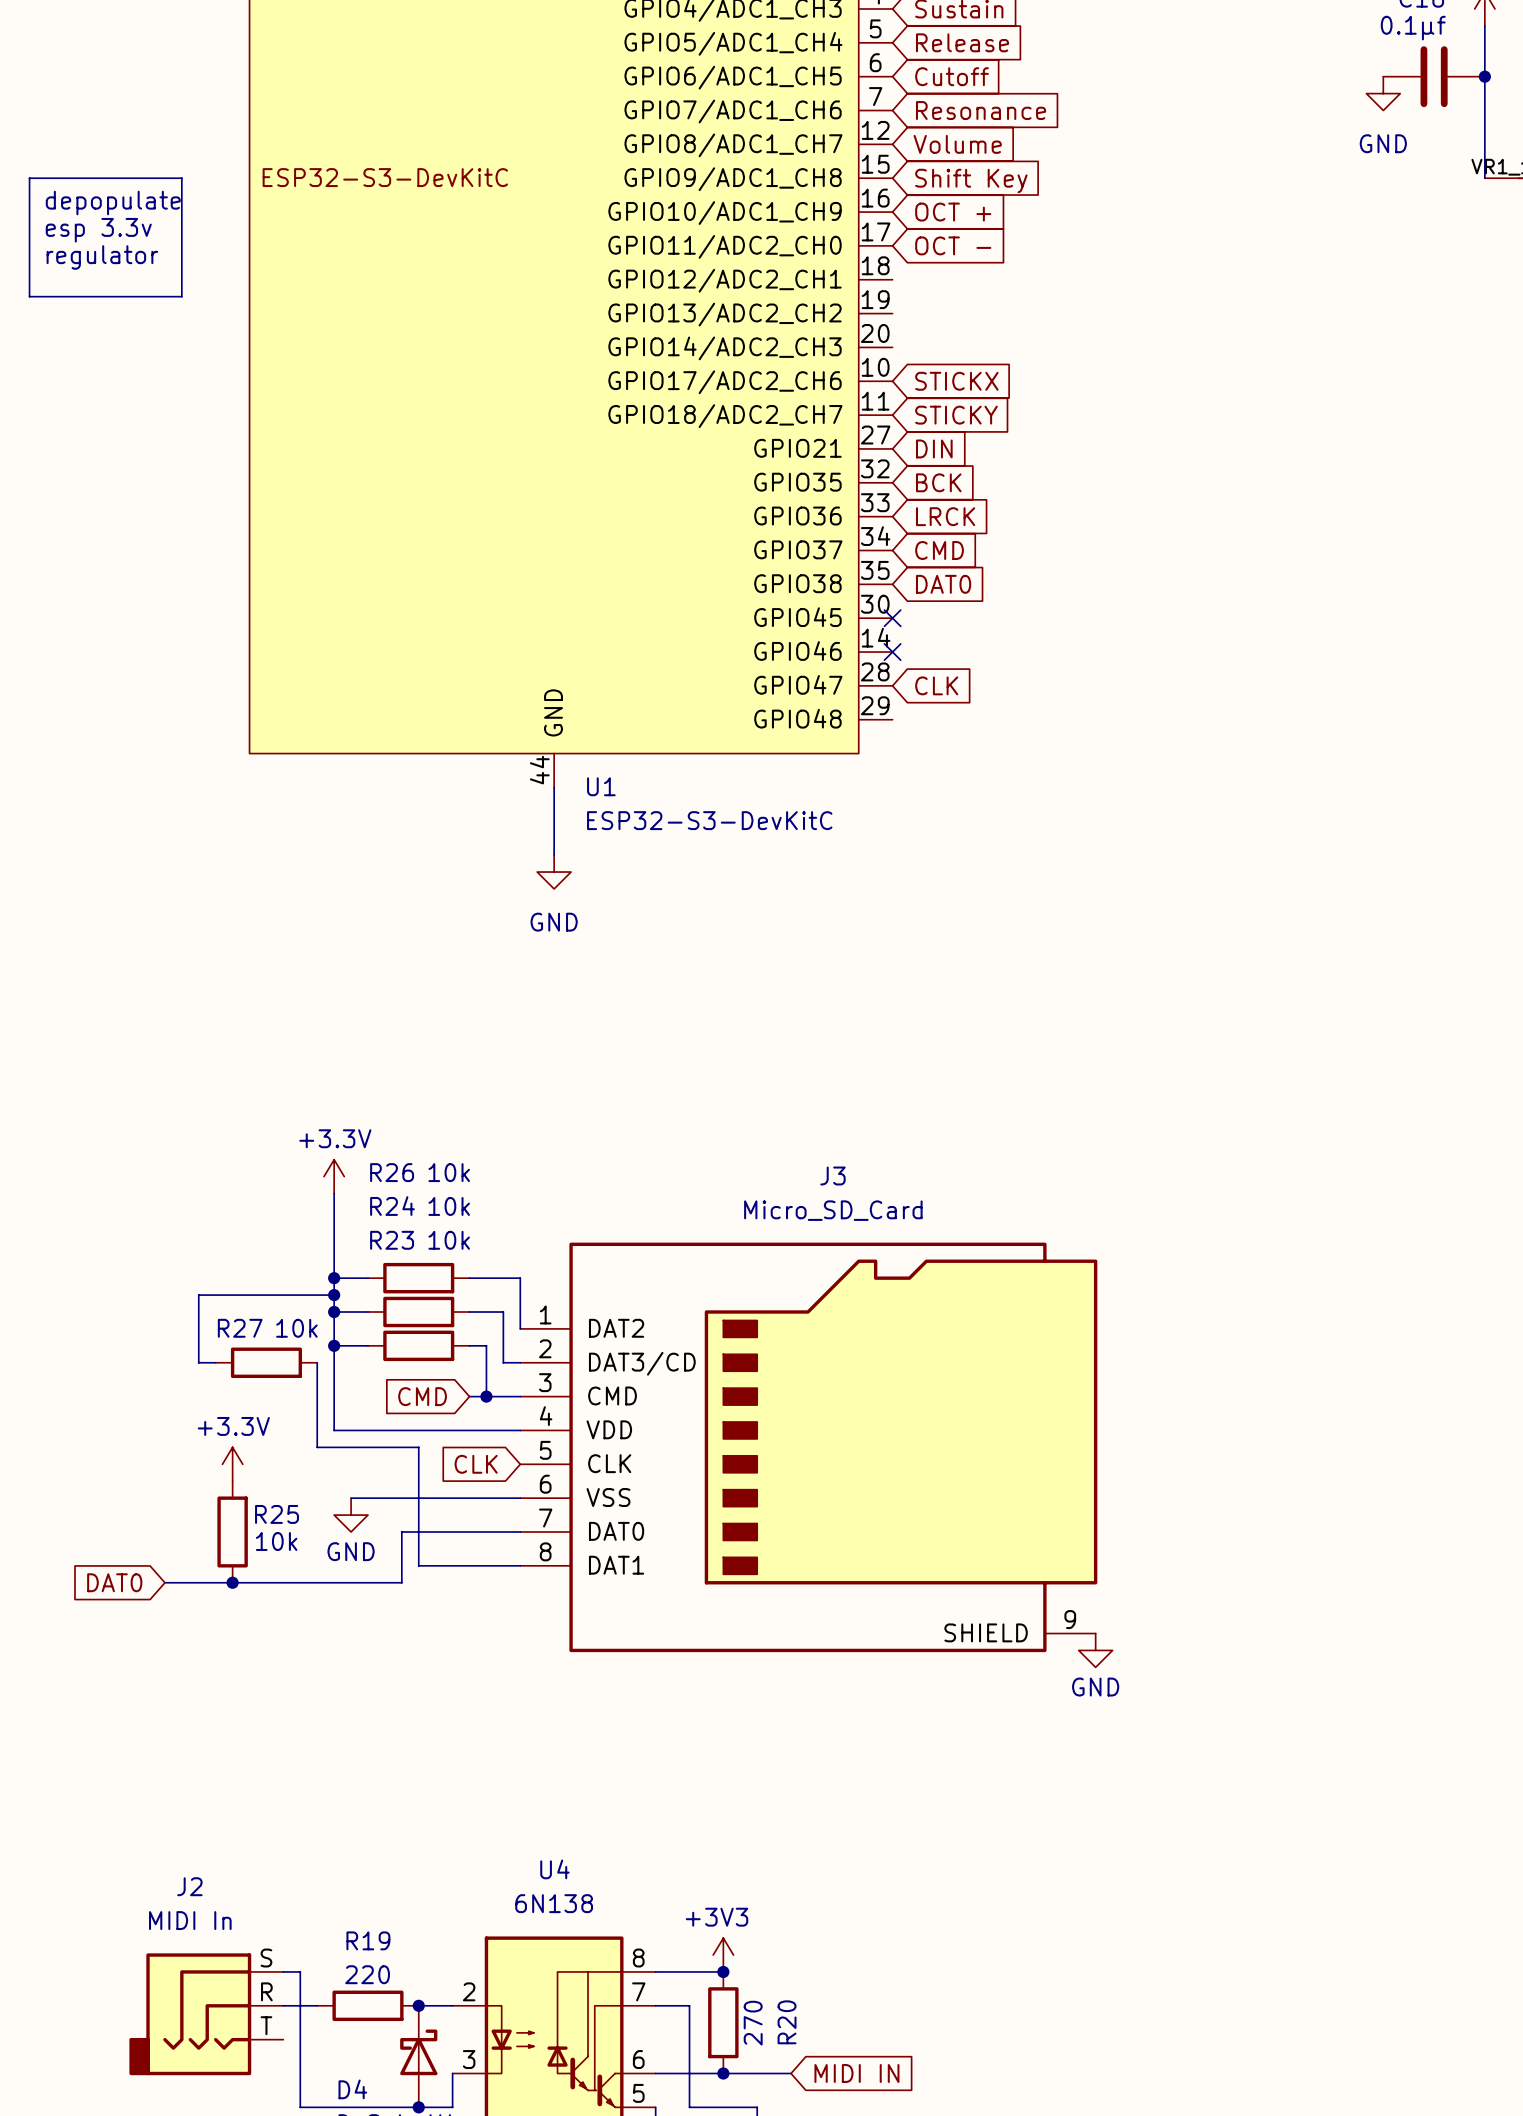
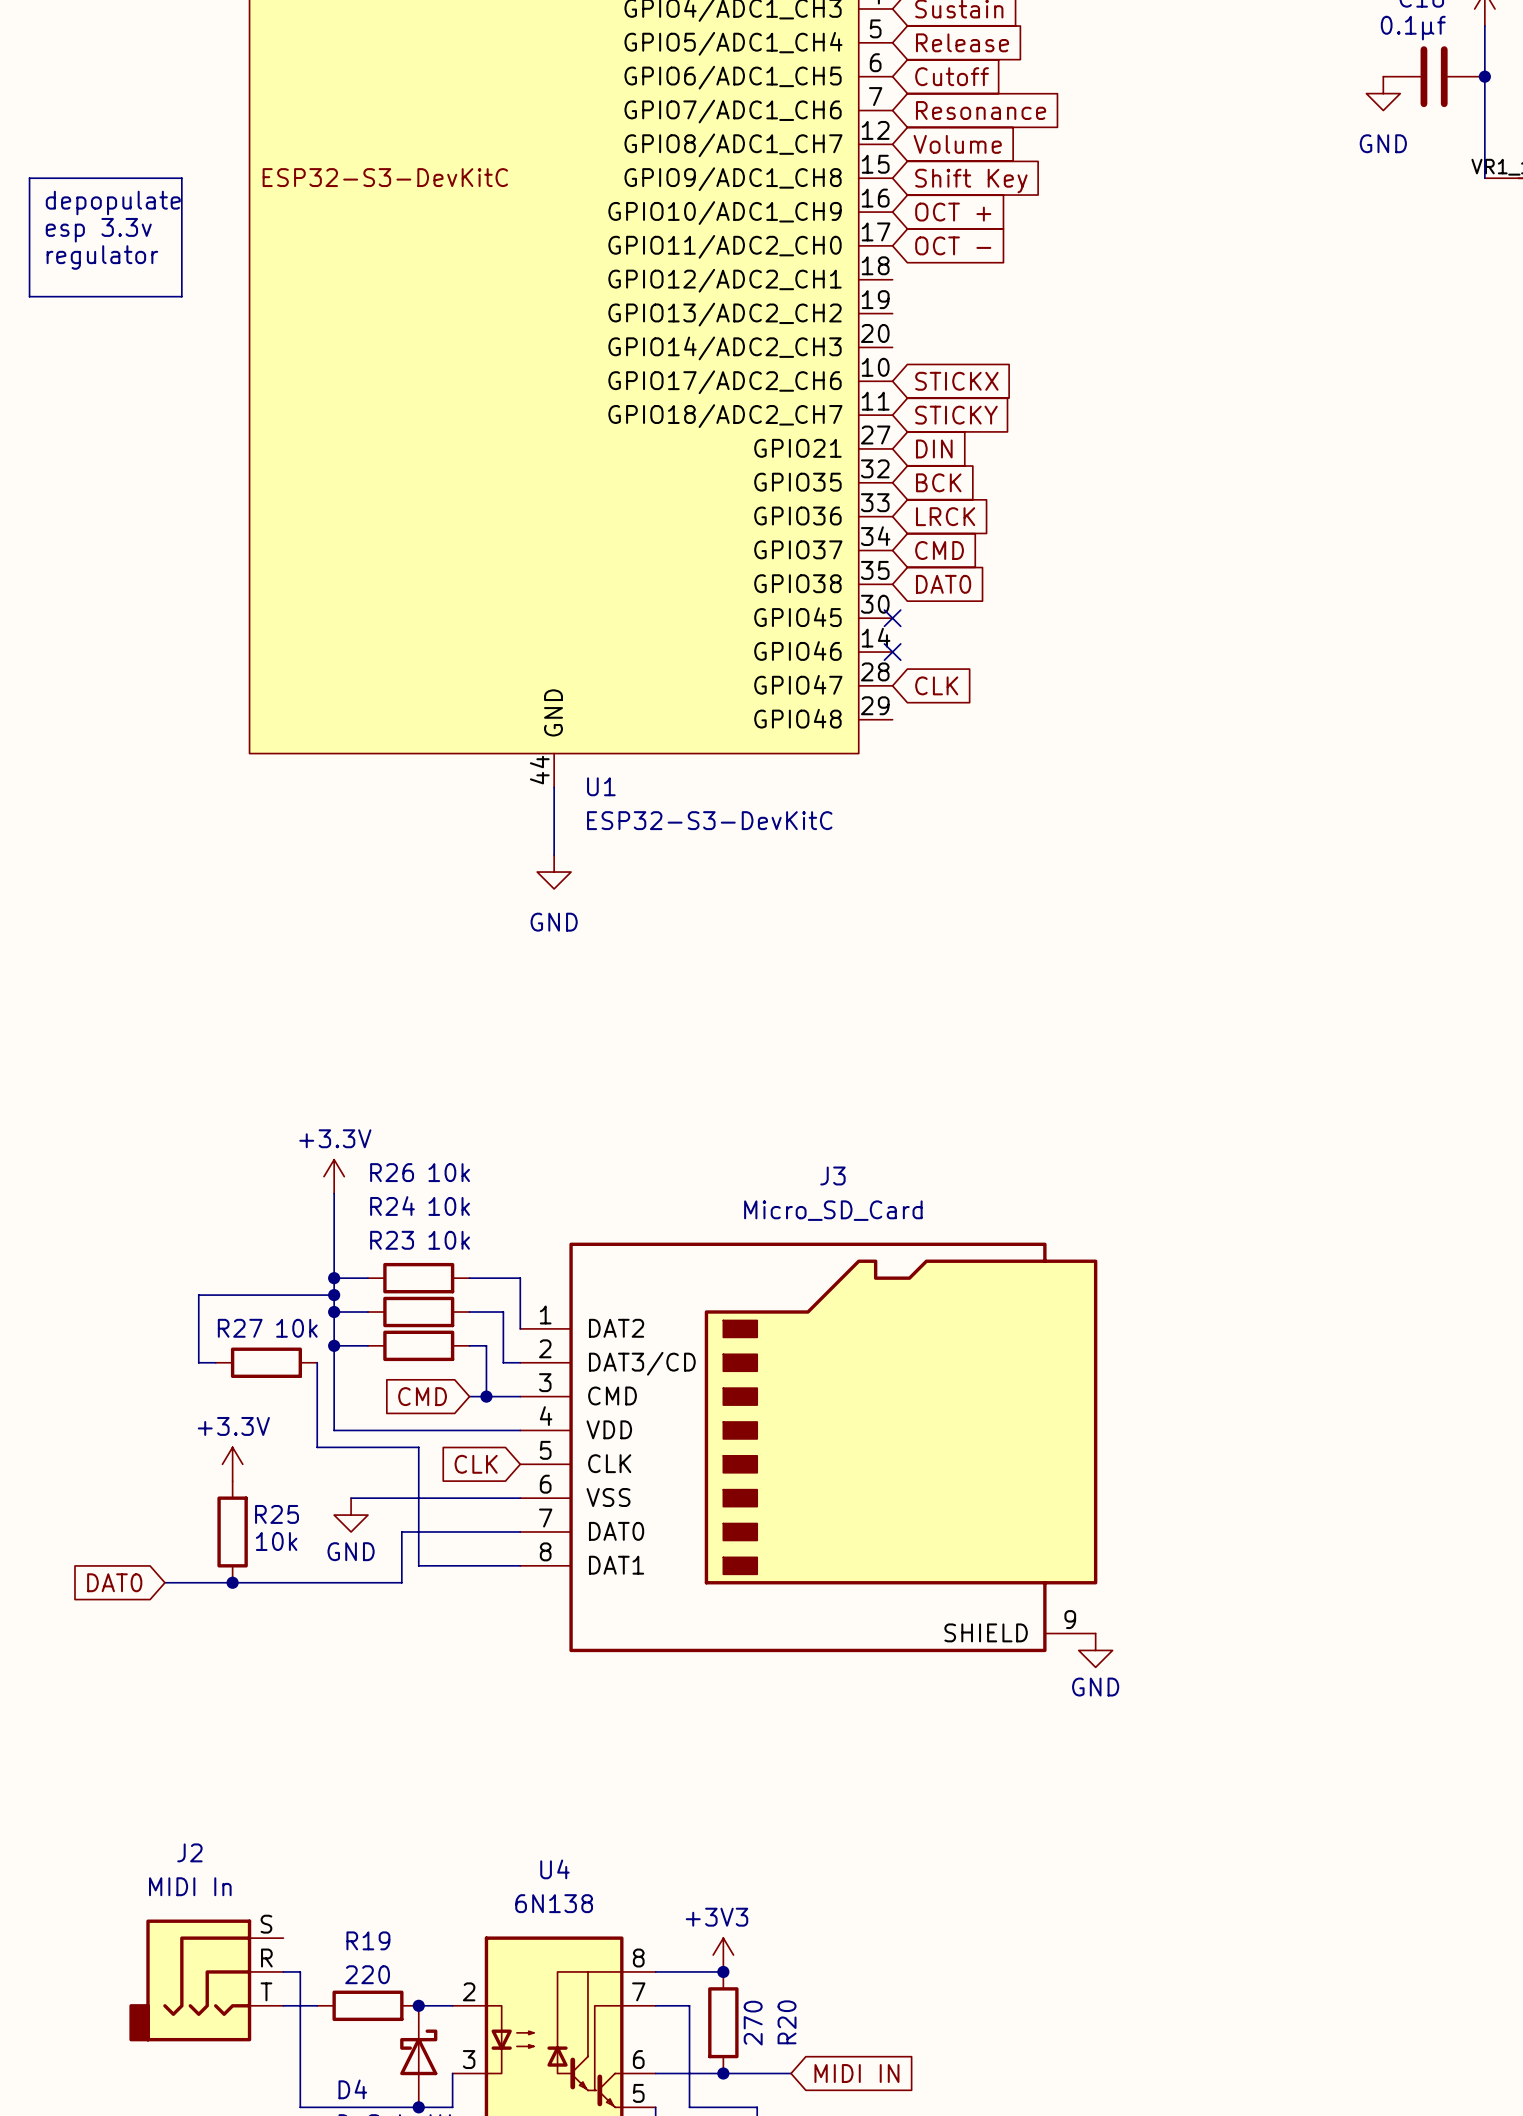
J2 position: (206, 2014) -> (206, 1980)

